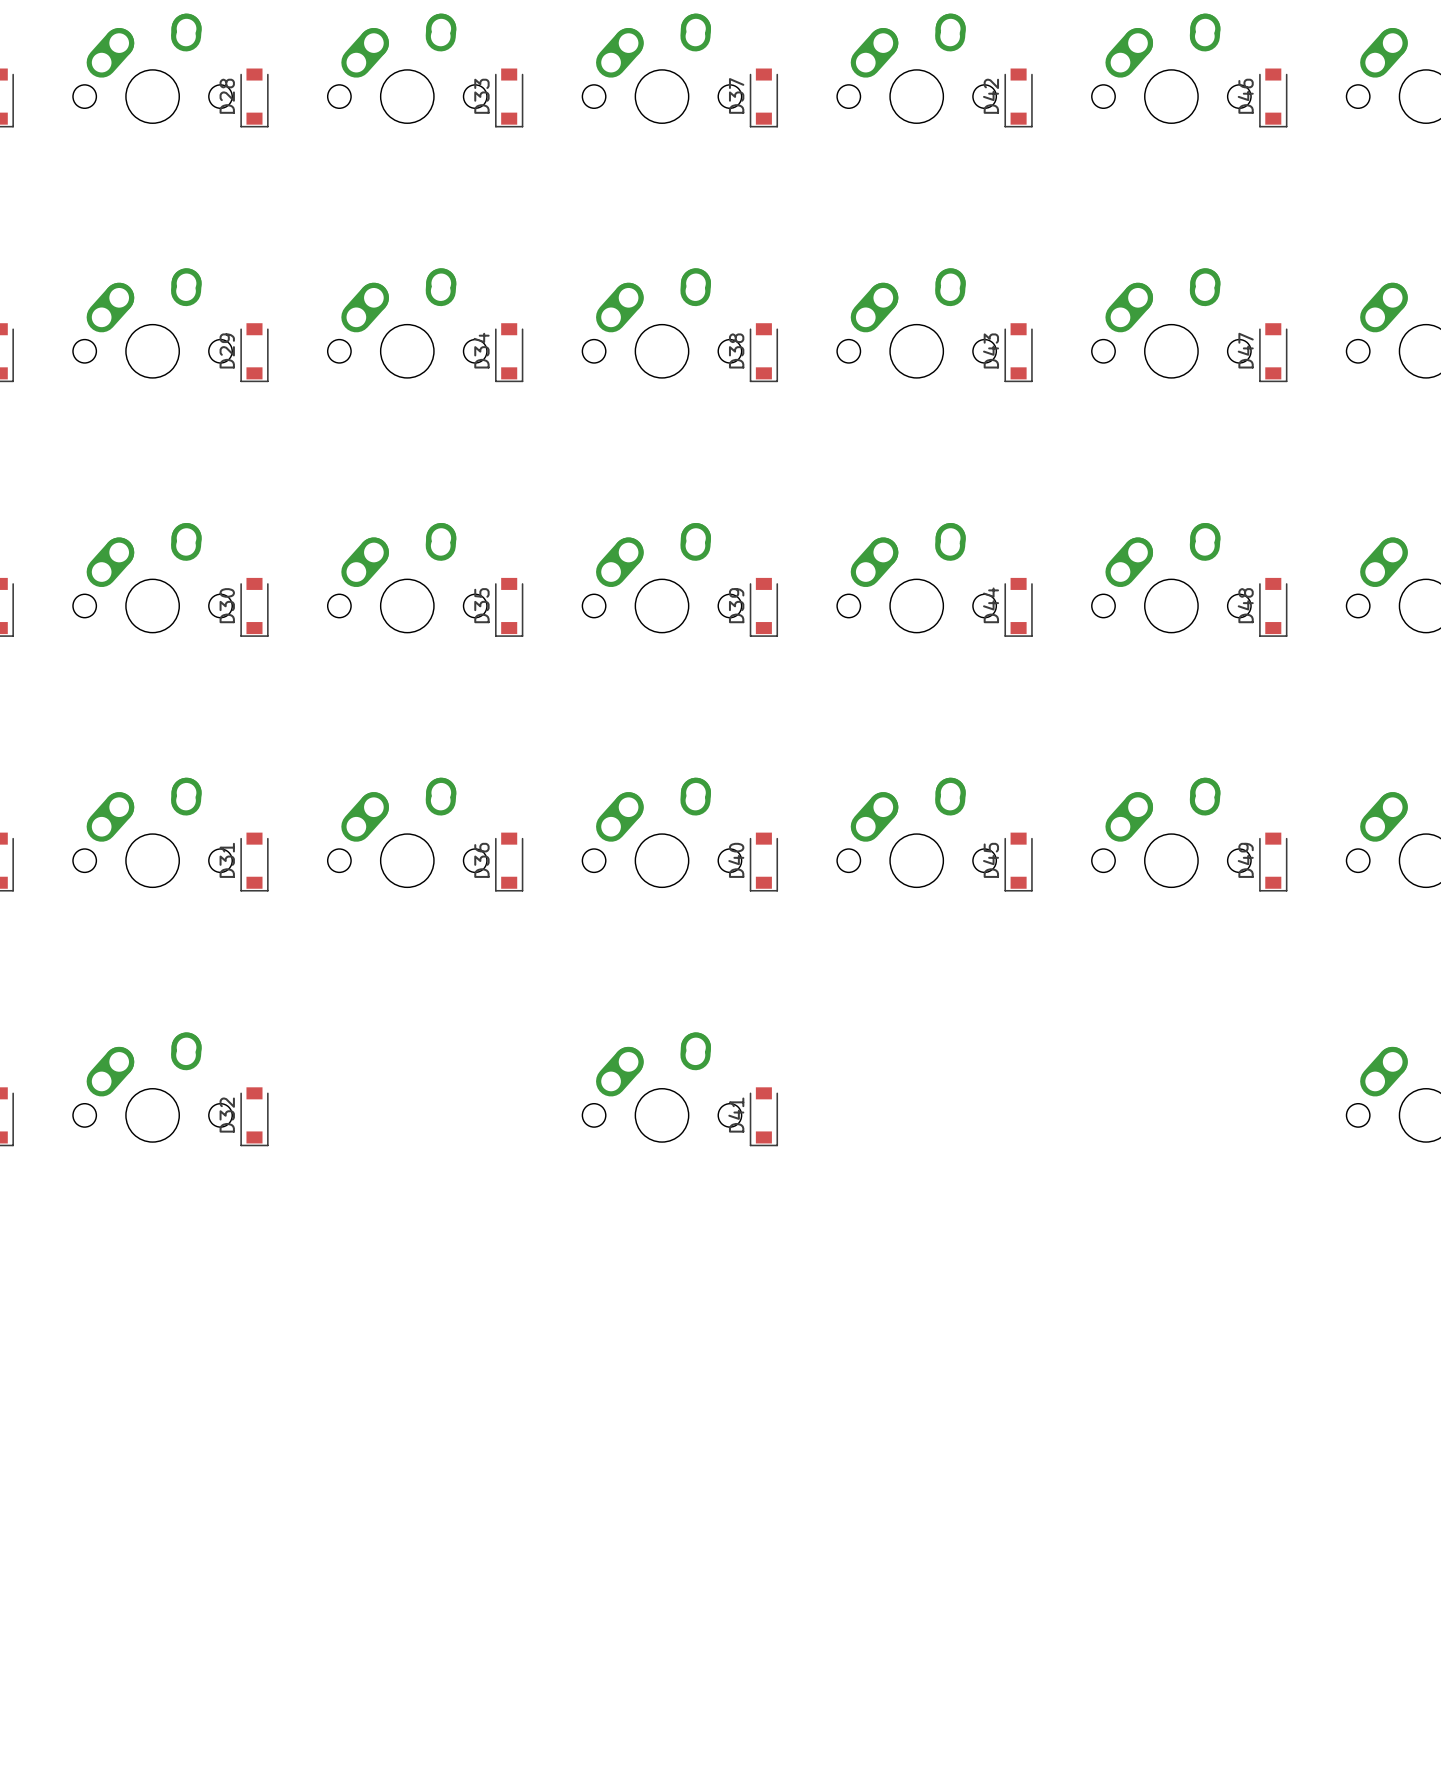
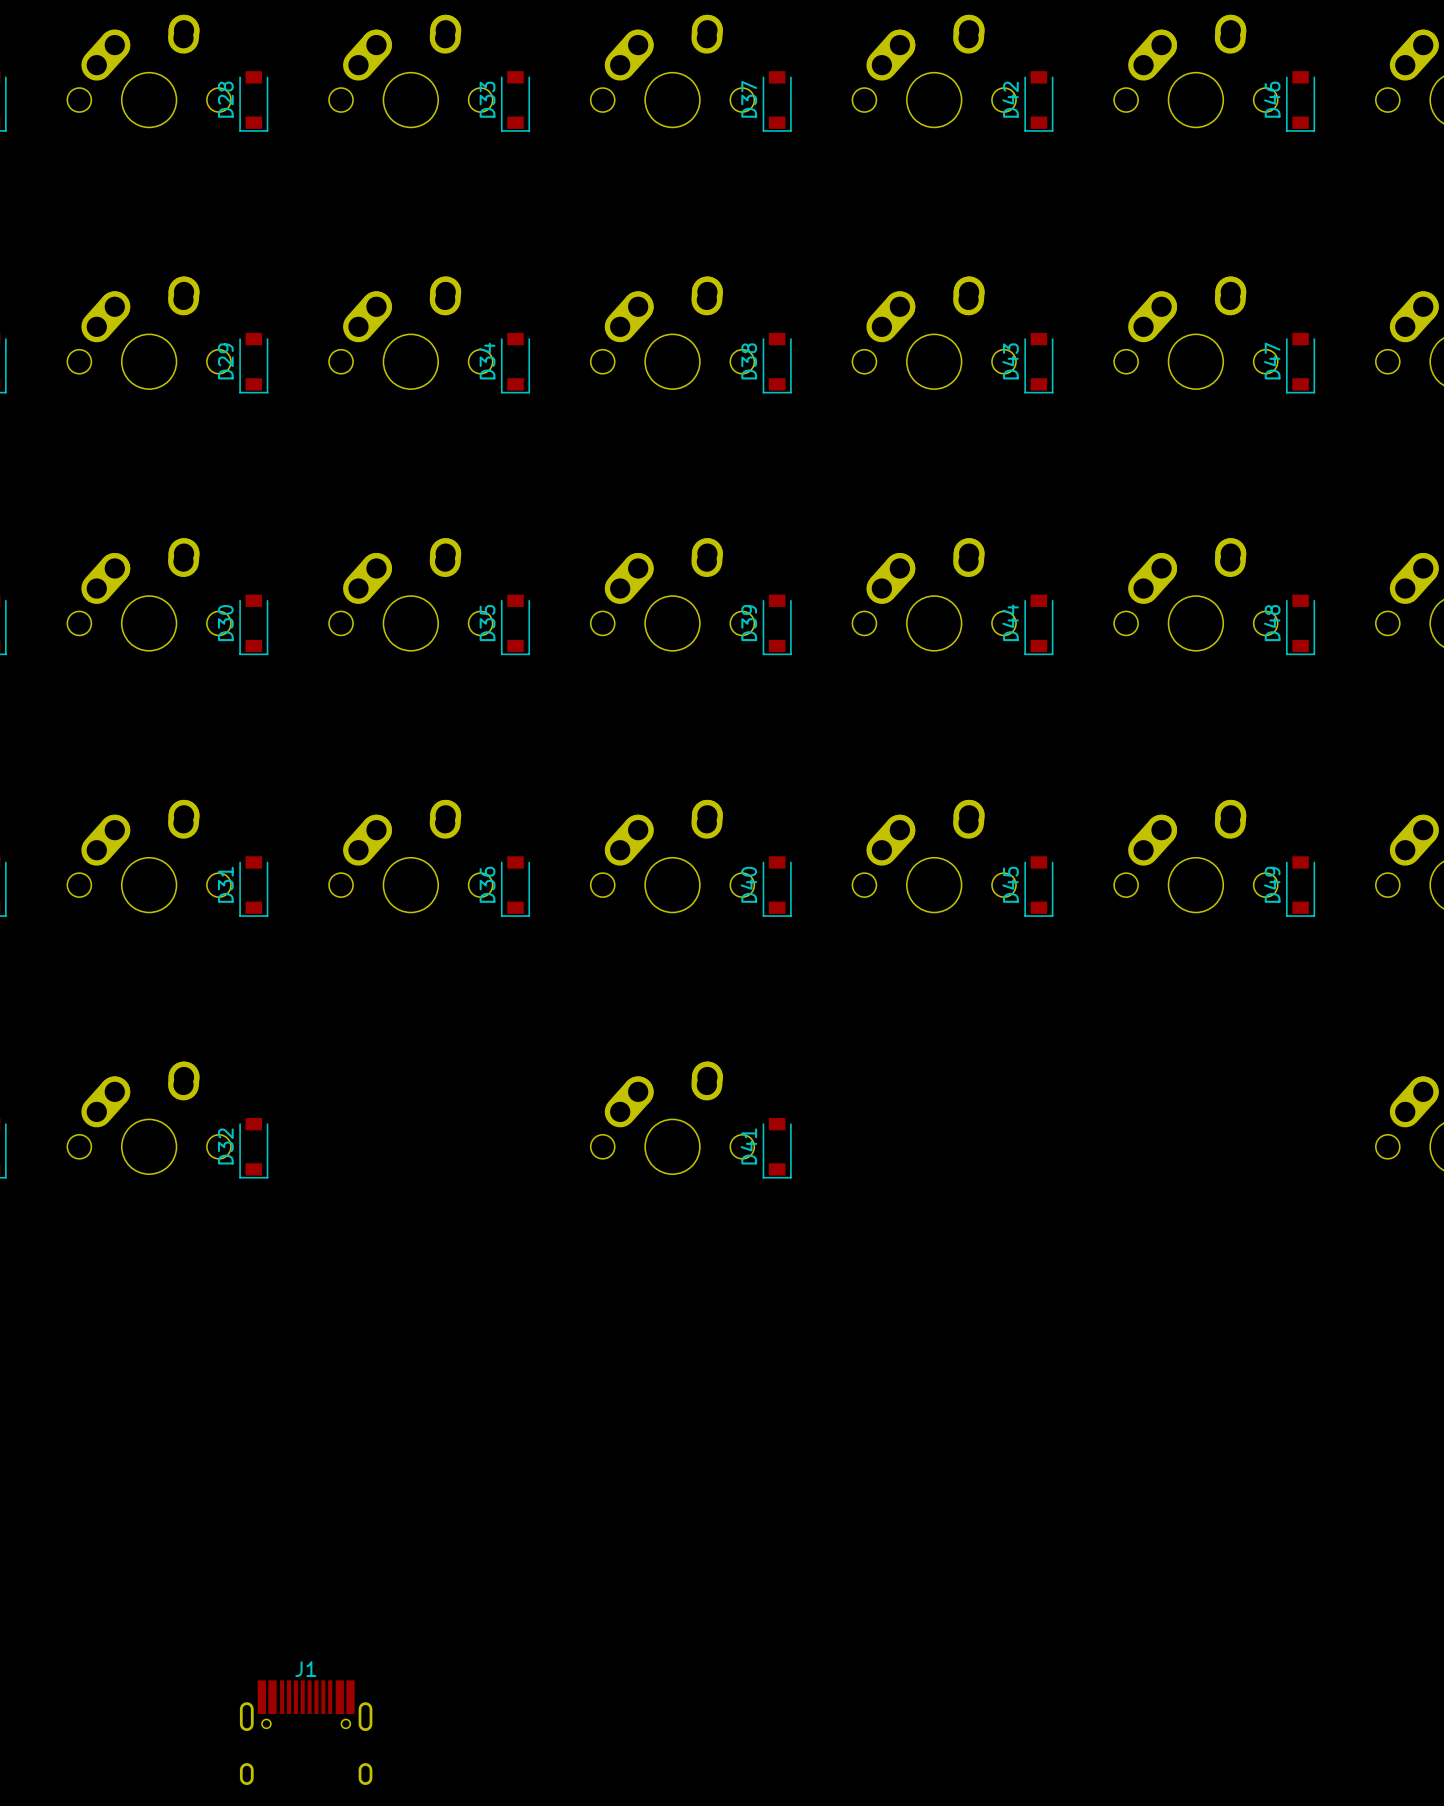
J1: none -> (306, 1732)

